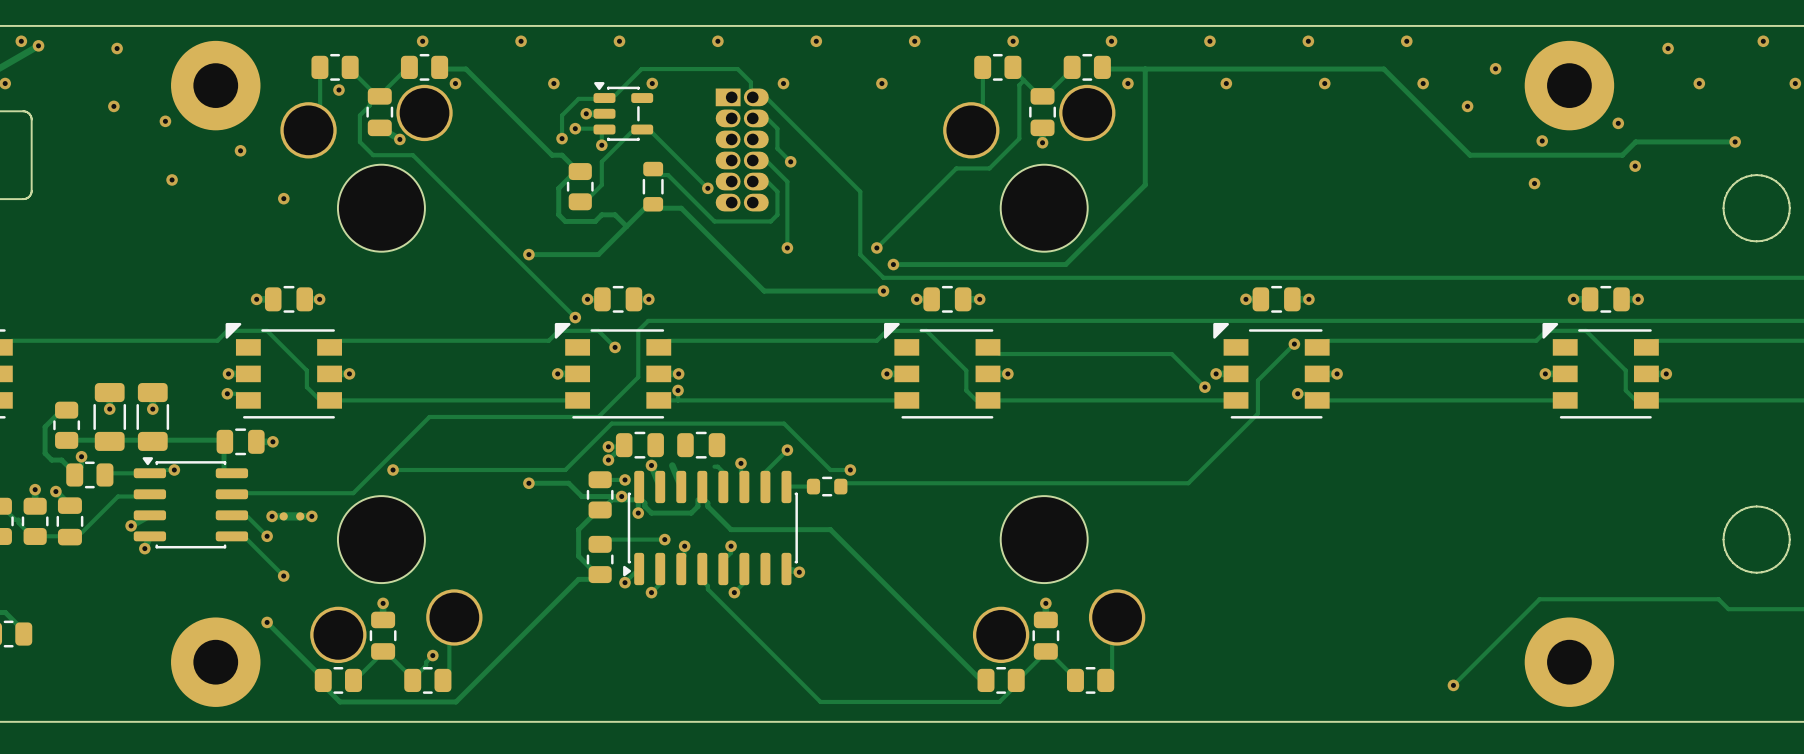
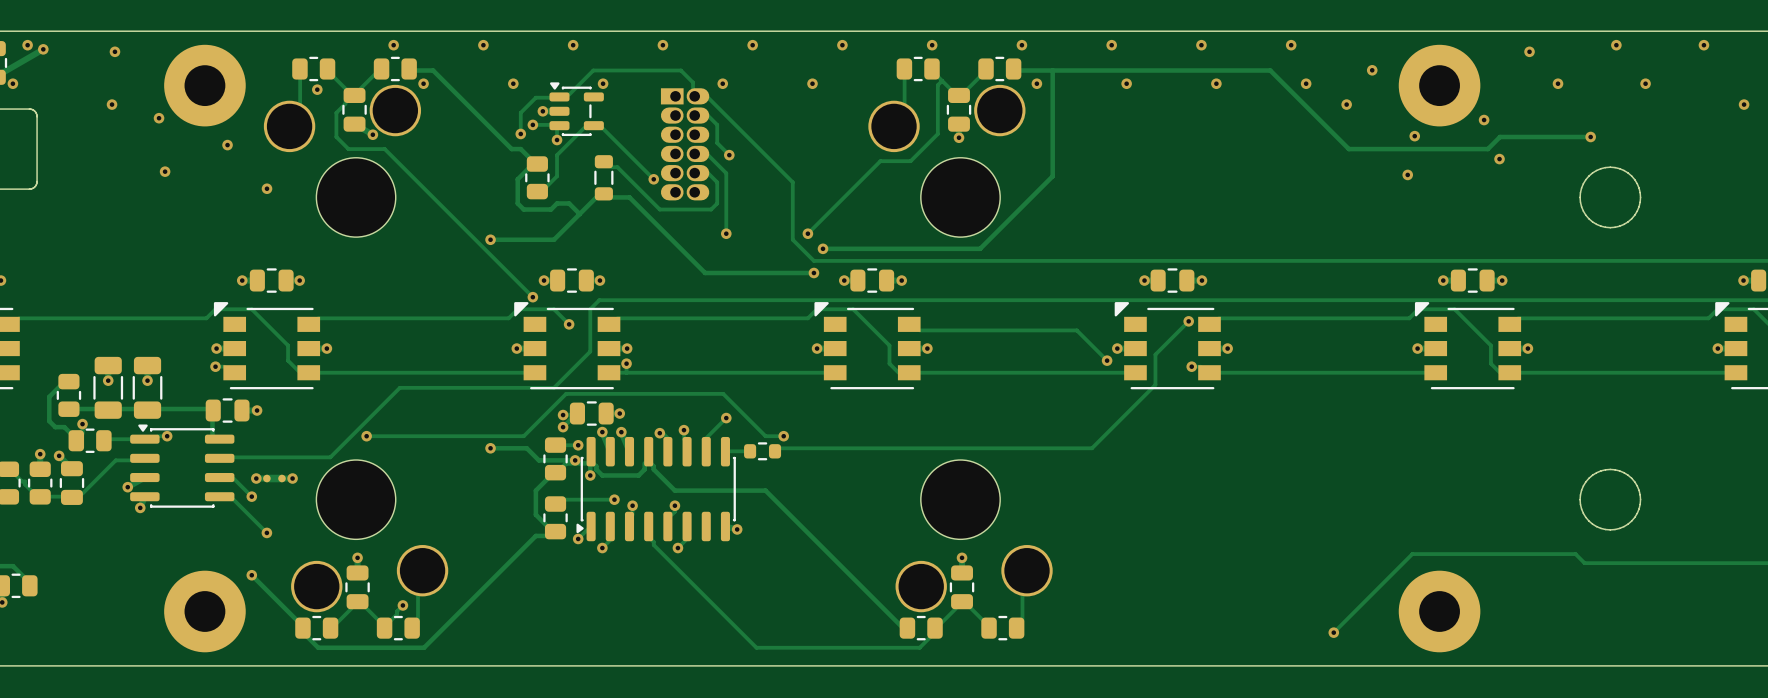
via: none -> (619, 413)
part: (701, 445) -> none
via: none -> (621, 432)
via: none -> (659, 433)

